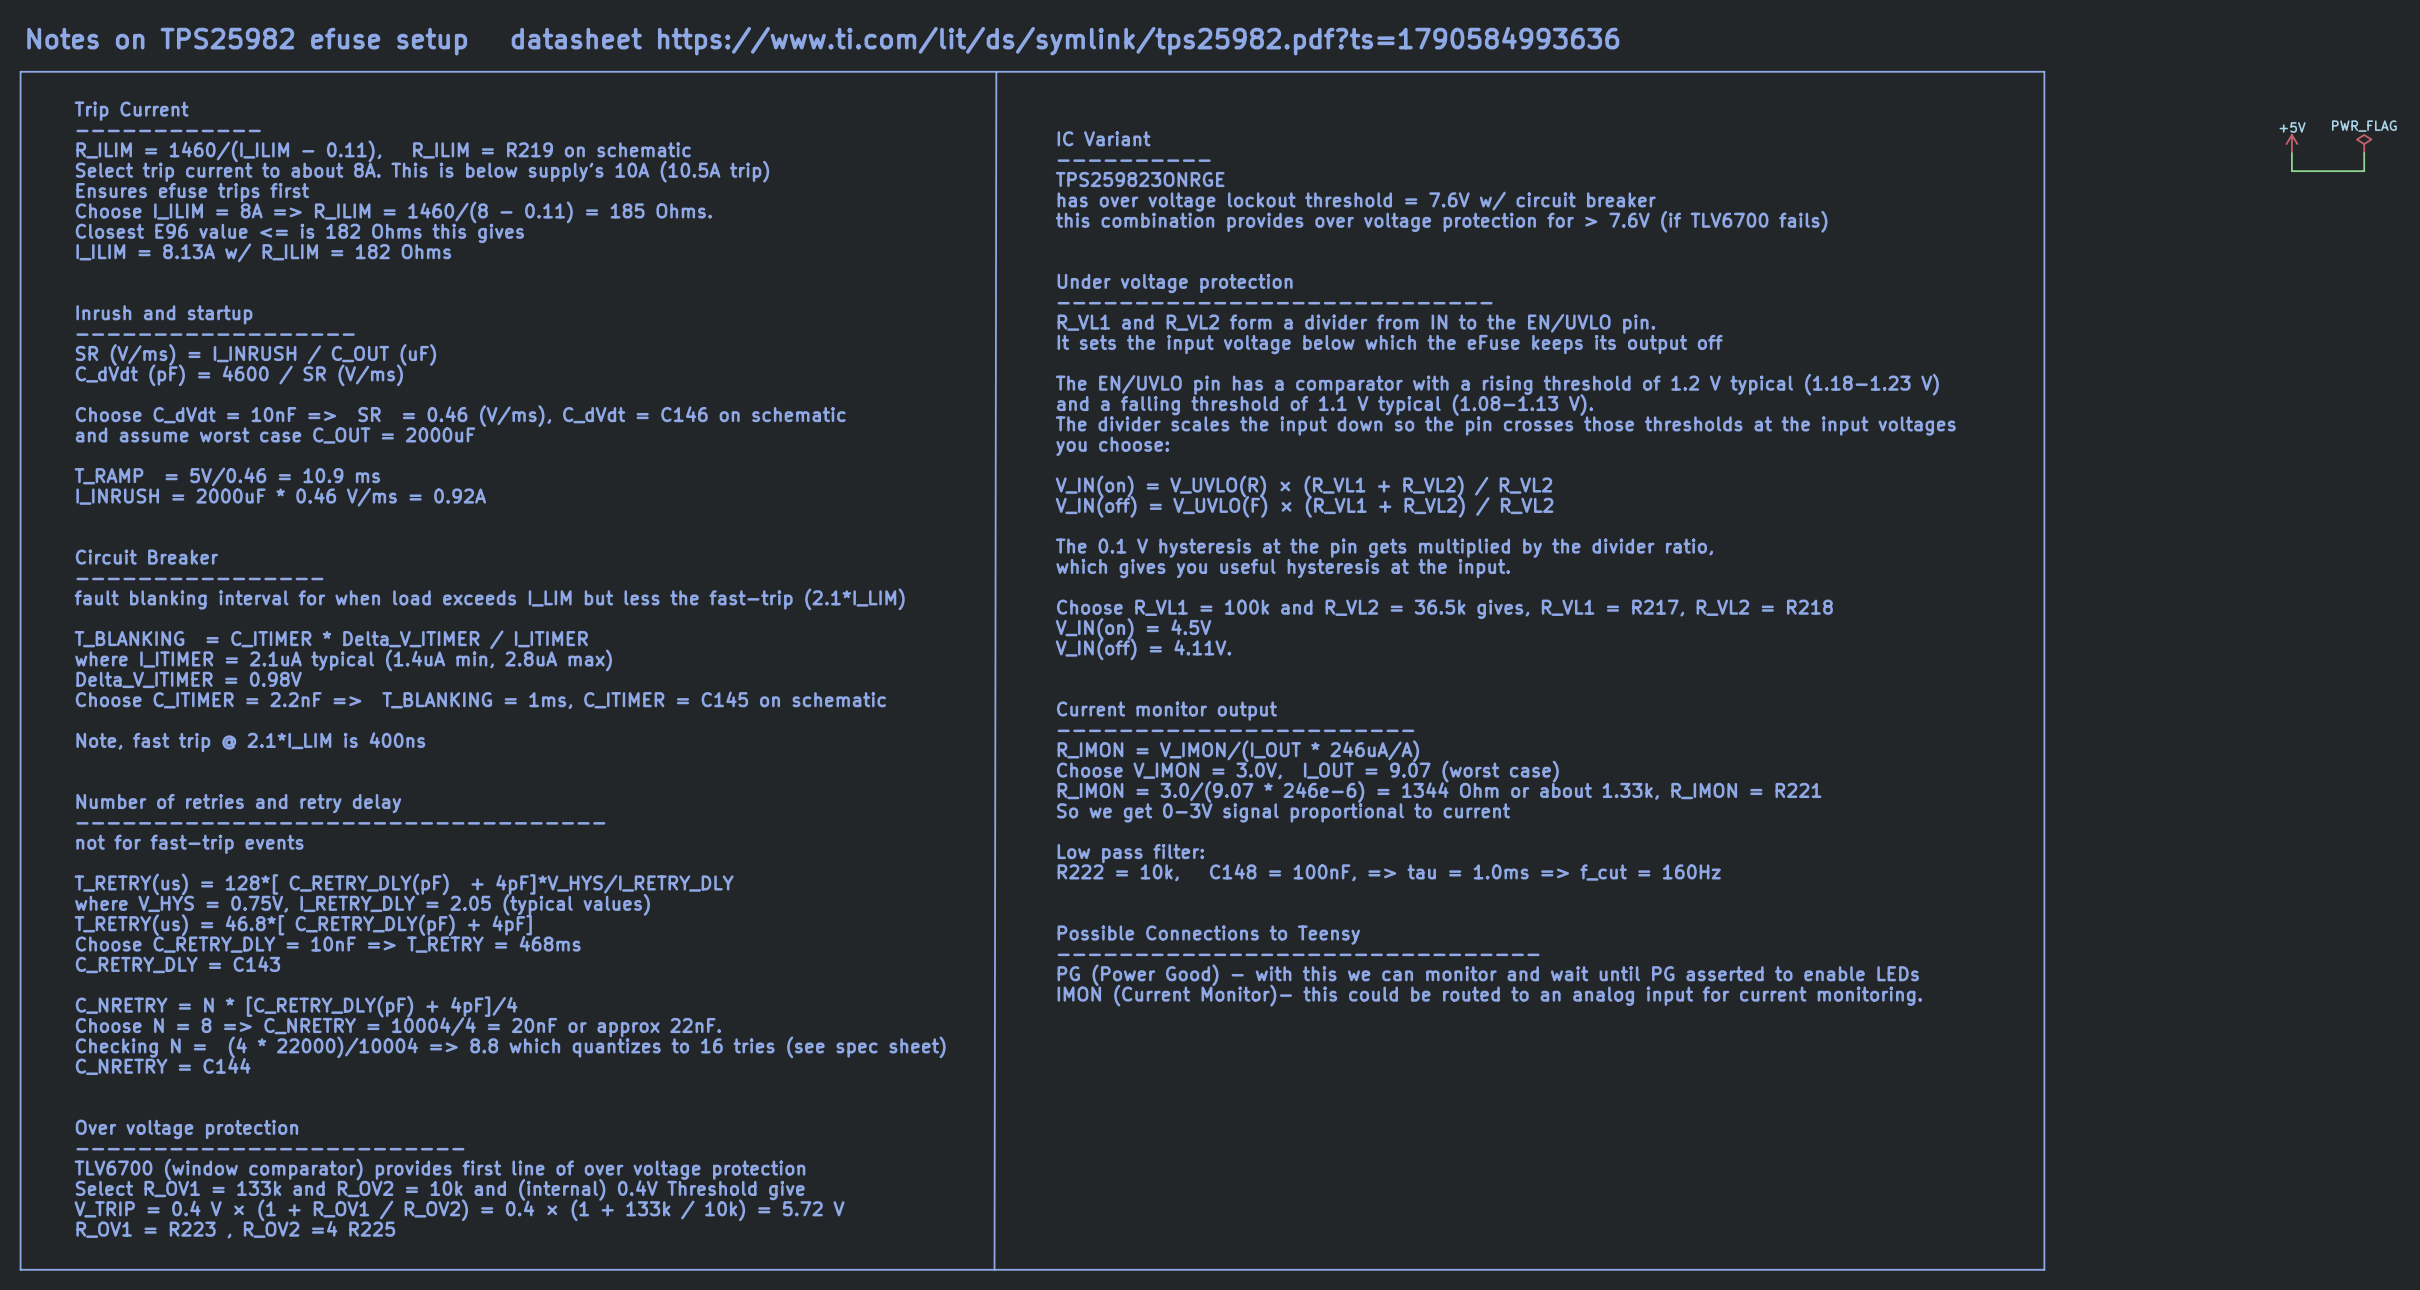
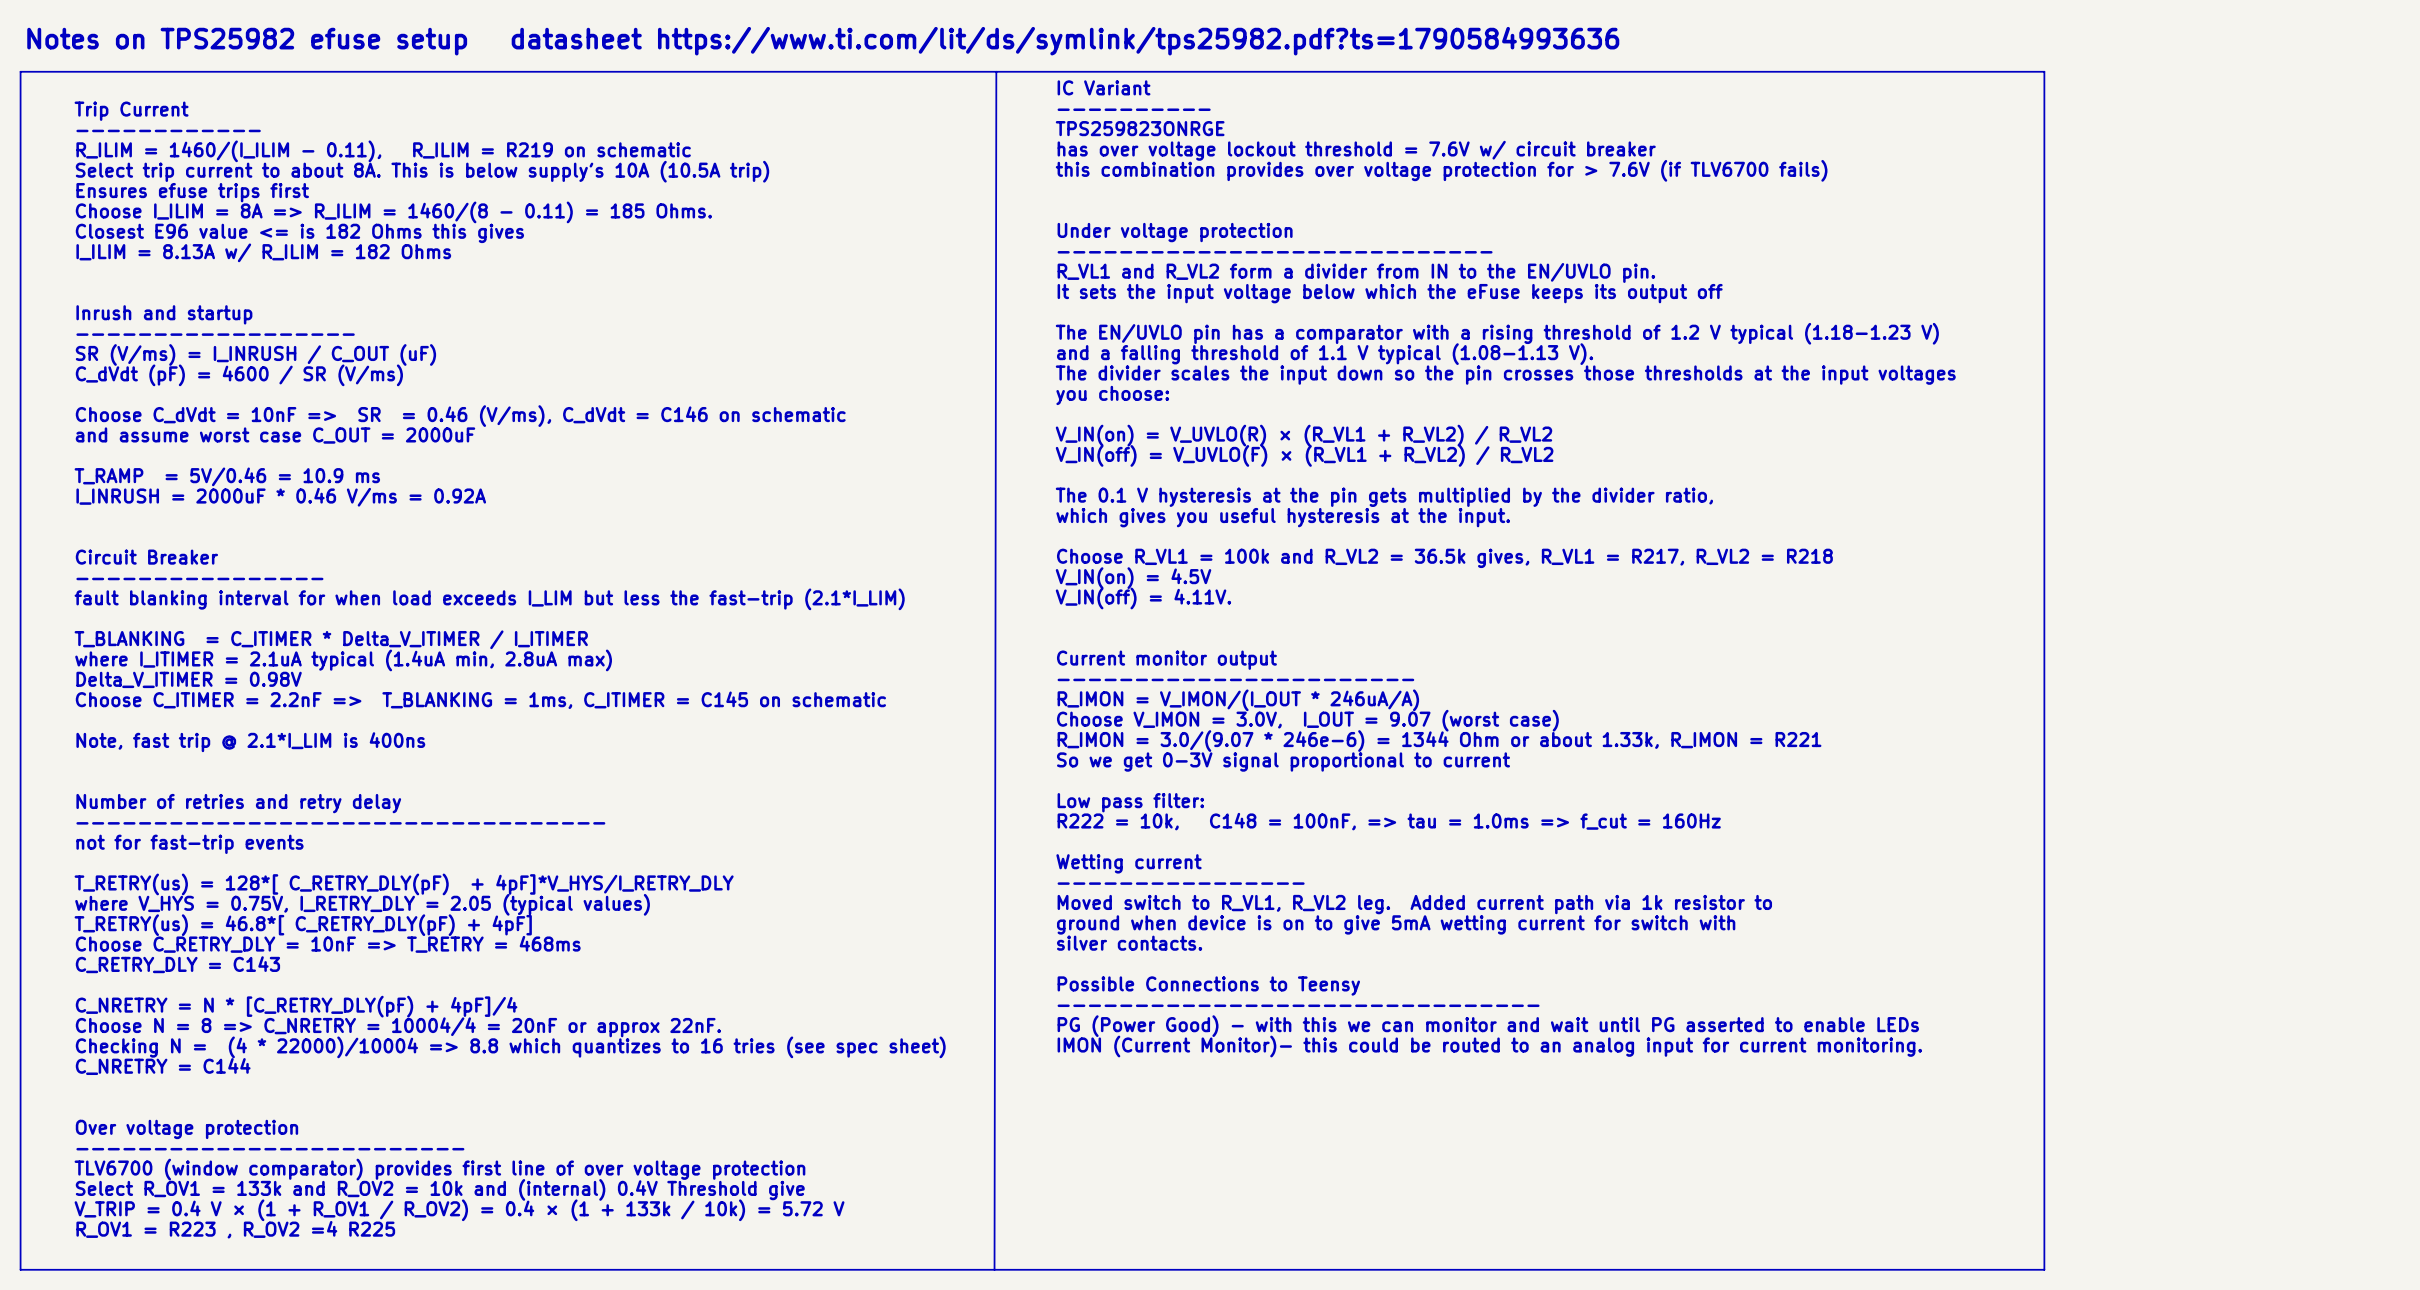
text position: IC Variant (1104, 138) -> IC Variant (1104, 87)
power symbol: +5V (2291, 144) -> none
power symbol: PWR_FLAG (2364, 144) -> none
wire: (2291, 153) (2291, 171) (2364, 171) (2364, 153) -> none
text position: ---------- (1134, 160) -> ---------- (1134, 109)
text position: TPS259823ONRGE (1140, 179) -> TPS259823ONRGE (1140, 128)
text position: has over voltage lockout threshold = 7.6V w/ circuit breaker (1356, 201) -> has over voltage lockout threshold = 7.6V w/ circuit breaker (1356, 150)
text position: this combination provides over voltage protection for > 7.6V (if TLV6700 fails) (1441, 221) -> this combination provides over voltage protection for > 7.6V (if TLV6700 fails) (1441, 170)
text position: Under voltage protection (1175, 283) -> Under voltage protection (1175, 232)
text position: ---------------------------- (1275, 303) -> ---------------------------- (1275, 252)
text position: R_VL1 and R_VL2 form a divider from IN to the EN/UVLO pin. (1356, 323) -> R_VL1 and R_VL2 form a divider from IN to the EN/UVLO pin. (1356, 272)
text position: It sets the input voltage below which the eFuse keeps its output off (1390, 344) -> It sets the input voltage below which the eFuse keeps its output off (1390, 293)
text position: The EN/UVLO pin has a comparator with a rising threshold of 1.2 V typical (1.18-1.23 V) (1497, 384) -> The EN/UVLO pin has a comparator with a rising threshold of 1.2 V typical (1.18-1.23 V) (1497, 333)
text position: and a falling threshold of 1.1 V typical (1.08-1.13 V). (1325, 405) -> and a falling threshold of 1.1 V typical (1.08-1.13 V). (1325, 354)
text position: The divider scales the input down so the pin crosses those thresholds at the input voltages (1505, 425) -> The divider scales the input down so the pin crosses those thresholds at the input voltages (1505, 375)
text position: you choose: (1112, 446) -> you choose: (1112, 395)
text position: V_IN(on) = V_UVLO(R) × (R_VL1 + R_VL2) / R_VL2 (1303, 486) -> V_IN(on) = V_UVLO(R) × (R_VL1 + R_VL2) / R_VL2 (1303, 435)
text position: V_IN(off) = V_UVLO(F) × (R_VL1 + R_VL2) / R_VL2 (1304, 506) -> V_IN(off) = V_UVLO(F) × (R_VL1 + R_VL2) / R_VL2 (1304, 455)
text position: The 0.1 V hysteresis at the pin gets multiplied by the divider ratio, (1384, 548) -> The 0.1 V hysteresis at the pin gets multiplied by the divider ratio, (1384, 497)
text position: which gives you useful hysteresis at the input. (1283, 568) -> which gives you useful hysteresis at the input. (1283, 517)
text position: Choose R_VL1 = 100k and R_VL2 = 36.5k gives, R_VL1 = R217, R_VL2 = R218 (1444, 609) -> Choose R_VL1 = 100k and R_VL2 = 36.5k gives, R_VL1 = R217, R_VL2 = R218 (1444, 558)
text position: V_IN(on) = 4.5V (1133, 629) -> V_IN(on) = 4.5V (1133, 578)
text position: V_IN(off) = 4.11V. (1143, 649) -> V_IN(off) = 4.11V. (1143, 598)
text position: Current monitor output (1166, 711) -> Current monitor output (1166, 660)
text position: ----------------------- (1235, 730) -> ----------------------- (1235, 679)
text position: R_IMON = V_IMON/(I_OUT * 246uA/A) (1238, 751) -> R_IMON = V_IMON/(I_OUT * 246uA/A) (1238, 700)
text position: Choose V_IMON = 3.0V, I_OUT = 9.07 (worst case) (1307, 771) -> Choose V_IMON = 3.0V, I_OUT = 9.07 (worst case) (1307, 720)
text position: R_IMON = 3.0/(9.07 * 246e-6) = 1344 Ohm or about 1.33k, R_IMON = R221 (1439, 791) -> R_IMON = 3.0/(9.07 * 246e-6) = 1344 Ohm or about 1.33k, R_IMON = R221 (1439, 741)
text position: So we get 0-3V signal proportional to current (1283, 812) -> So we get 0-3V signal proportional to current (1283, 762)
text position: Low pass filter: (1130, 853) -> Low pass filter: (1130, 802)
text: none -> Wetting current (1129, 863)
text position: R222 = 10k, C148 = 100nF, => tau = 1.0ms => f_cut = 160Hz (1389, 872) -> R222 = 10k, C148 = 100nF, => tau = 1.0ms => f_cut = 160Hz (1389, 821)
text: none -> ---------------- (1181, 883)
text: none -> Moved switch to R_VL1, R_VL2 leg. Added current path via 1k resistor to (1414, 904)
text: none -> ground when device is on to give 5mA wetting current for switch with (1396, 924)
text position: Possible Connections to Teensy (1208, 935) -> Possible Connections to Teensy (1208, 986)
text: none -> silver contacts. (1129, 943)
text position: ------------------------------- (1298, 954) -> ------------------------------- (1298, 1005)
text position: PG (Power Good) - with this we can monitor and wait until PG asserted to enable LEDs (1488, 975) -> PG (Power Good) - with this we can monitor and wait until PG asserted to enable LEDs (1488, 1026)
text position: IMON (Current Monitor)- this could be routed to an analog input for current monitoring. (1489, 995) -> IMON (Current Monitor)- this could be routed to an analog input for current monitoring. (1489, 1046)

